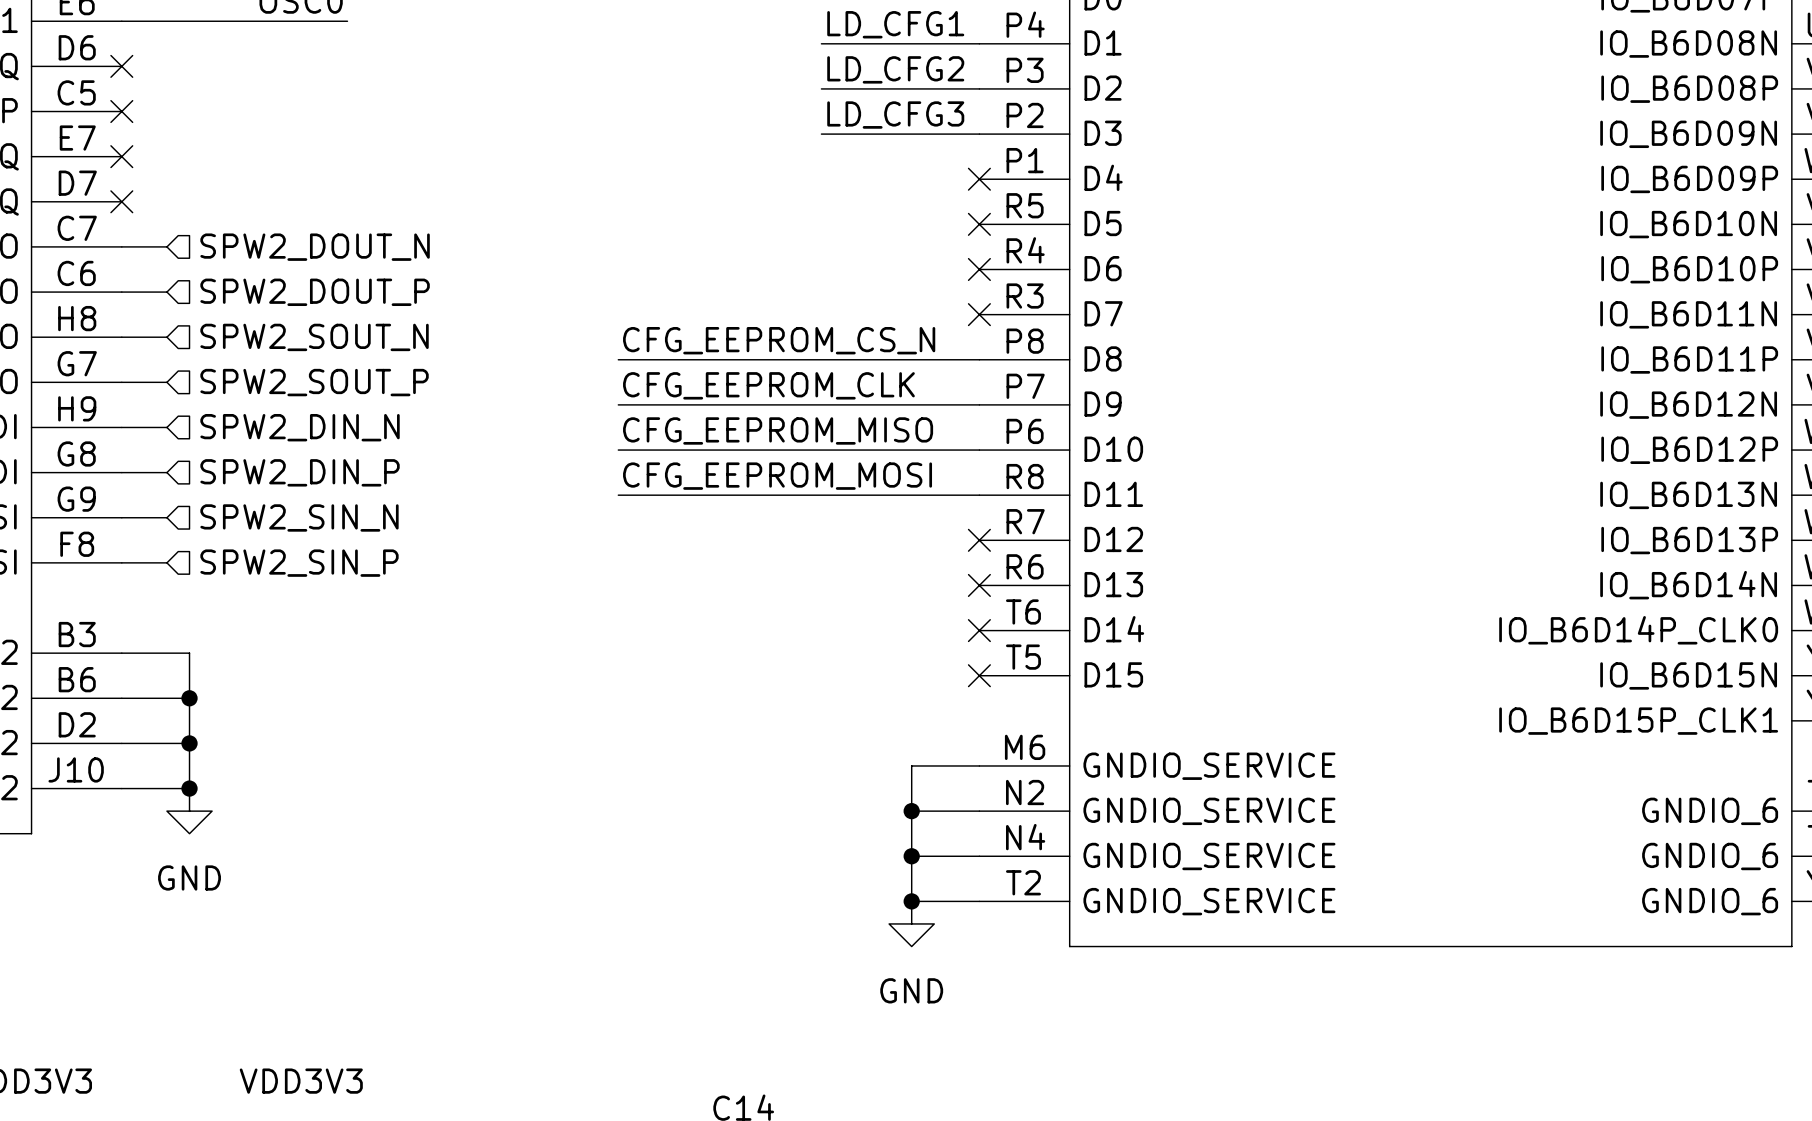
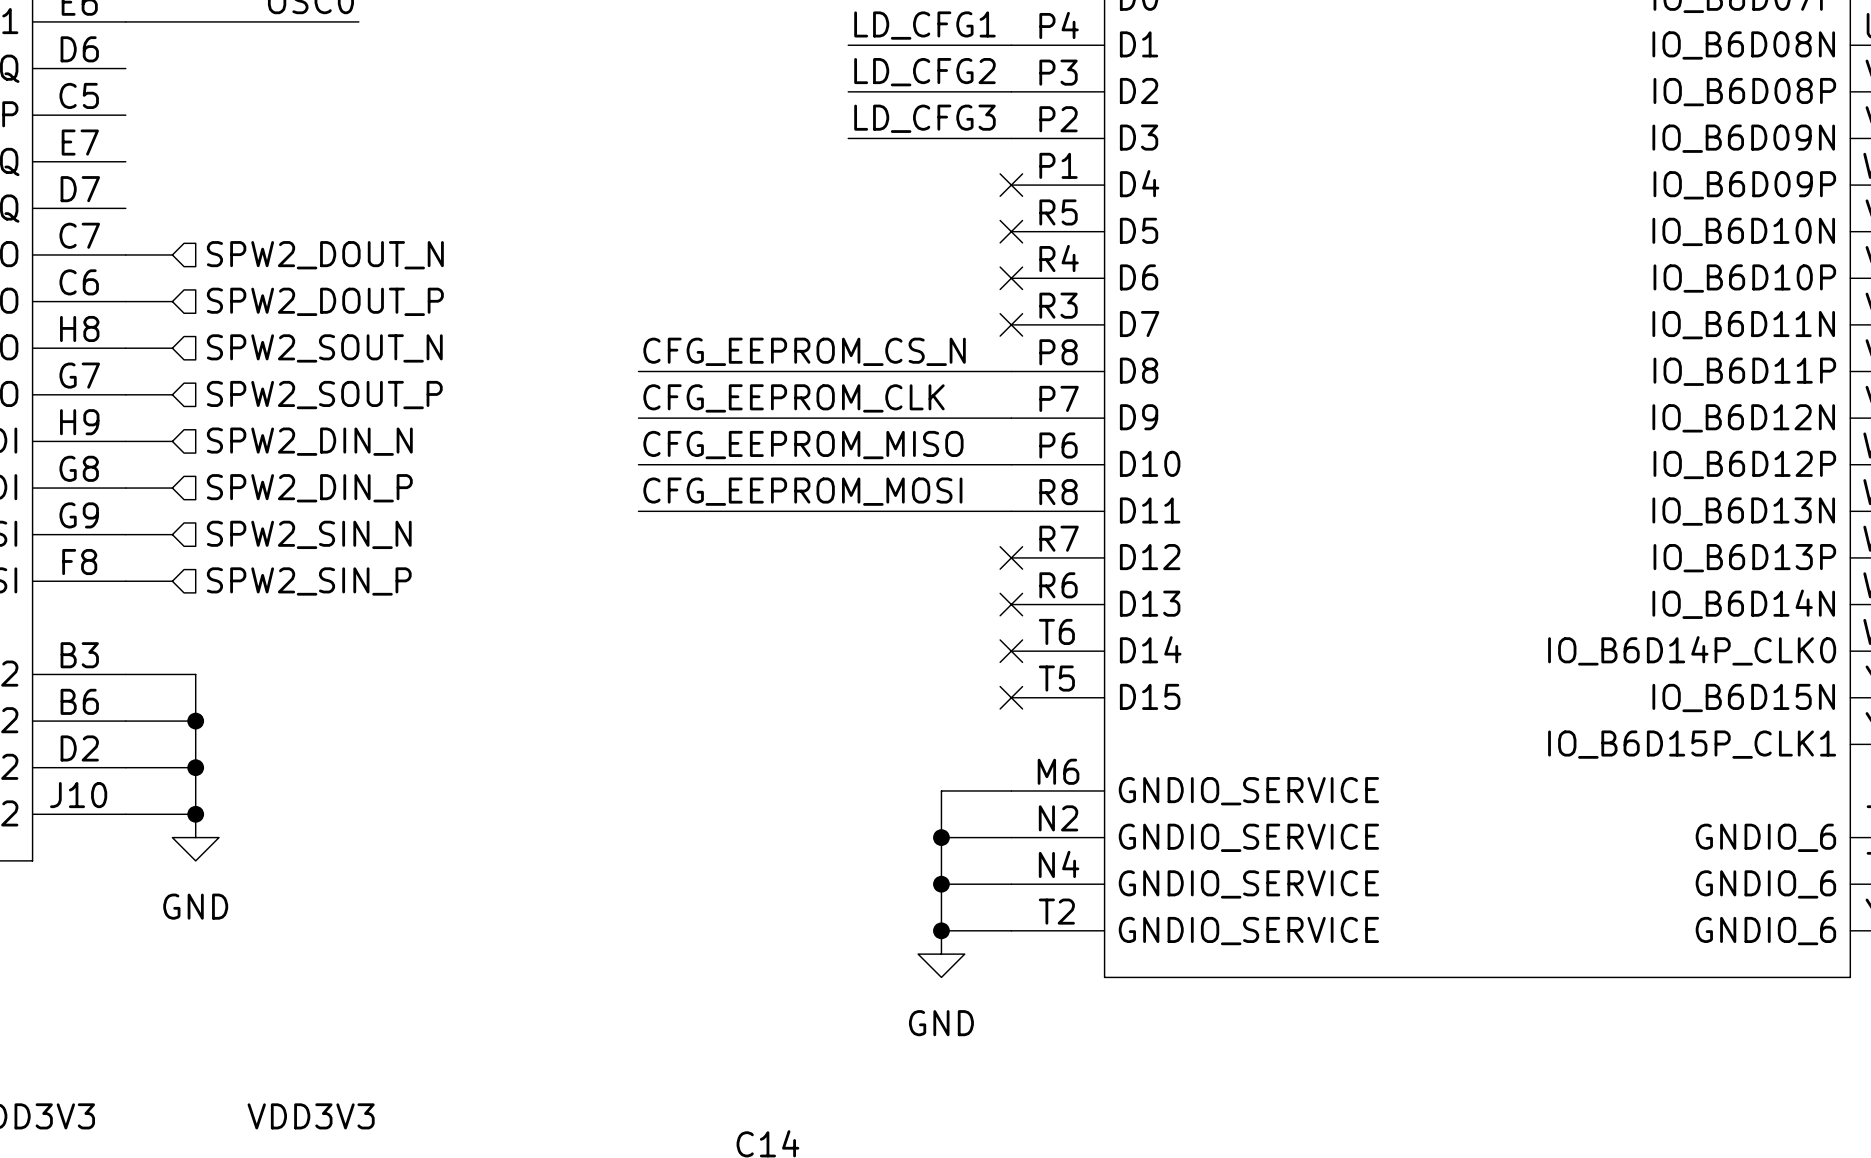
no-connect mark: (121, 66) -> none
no-connect mark: (121, 111) -> none
no-connect mark: (121, 156) -> none
no-connect mark: (121, 201) -> none

